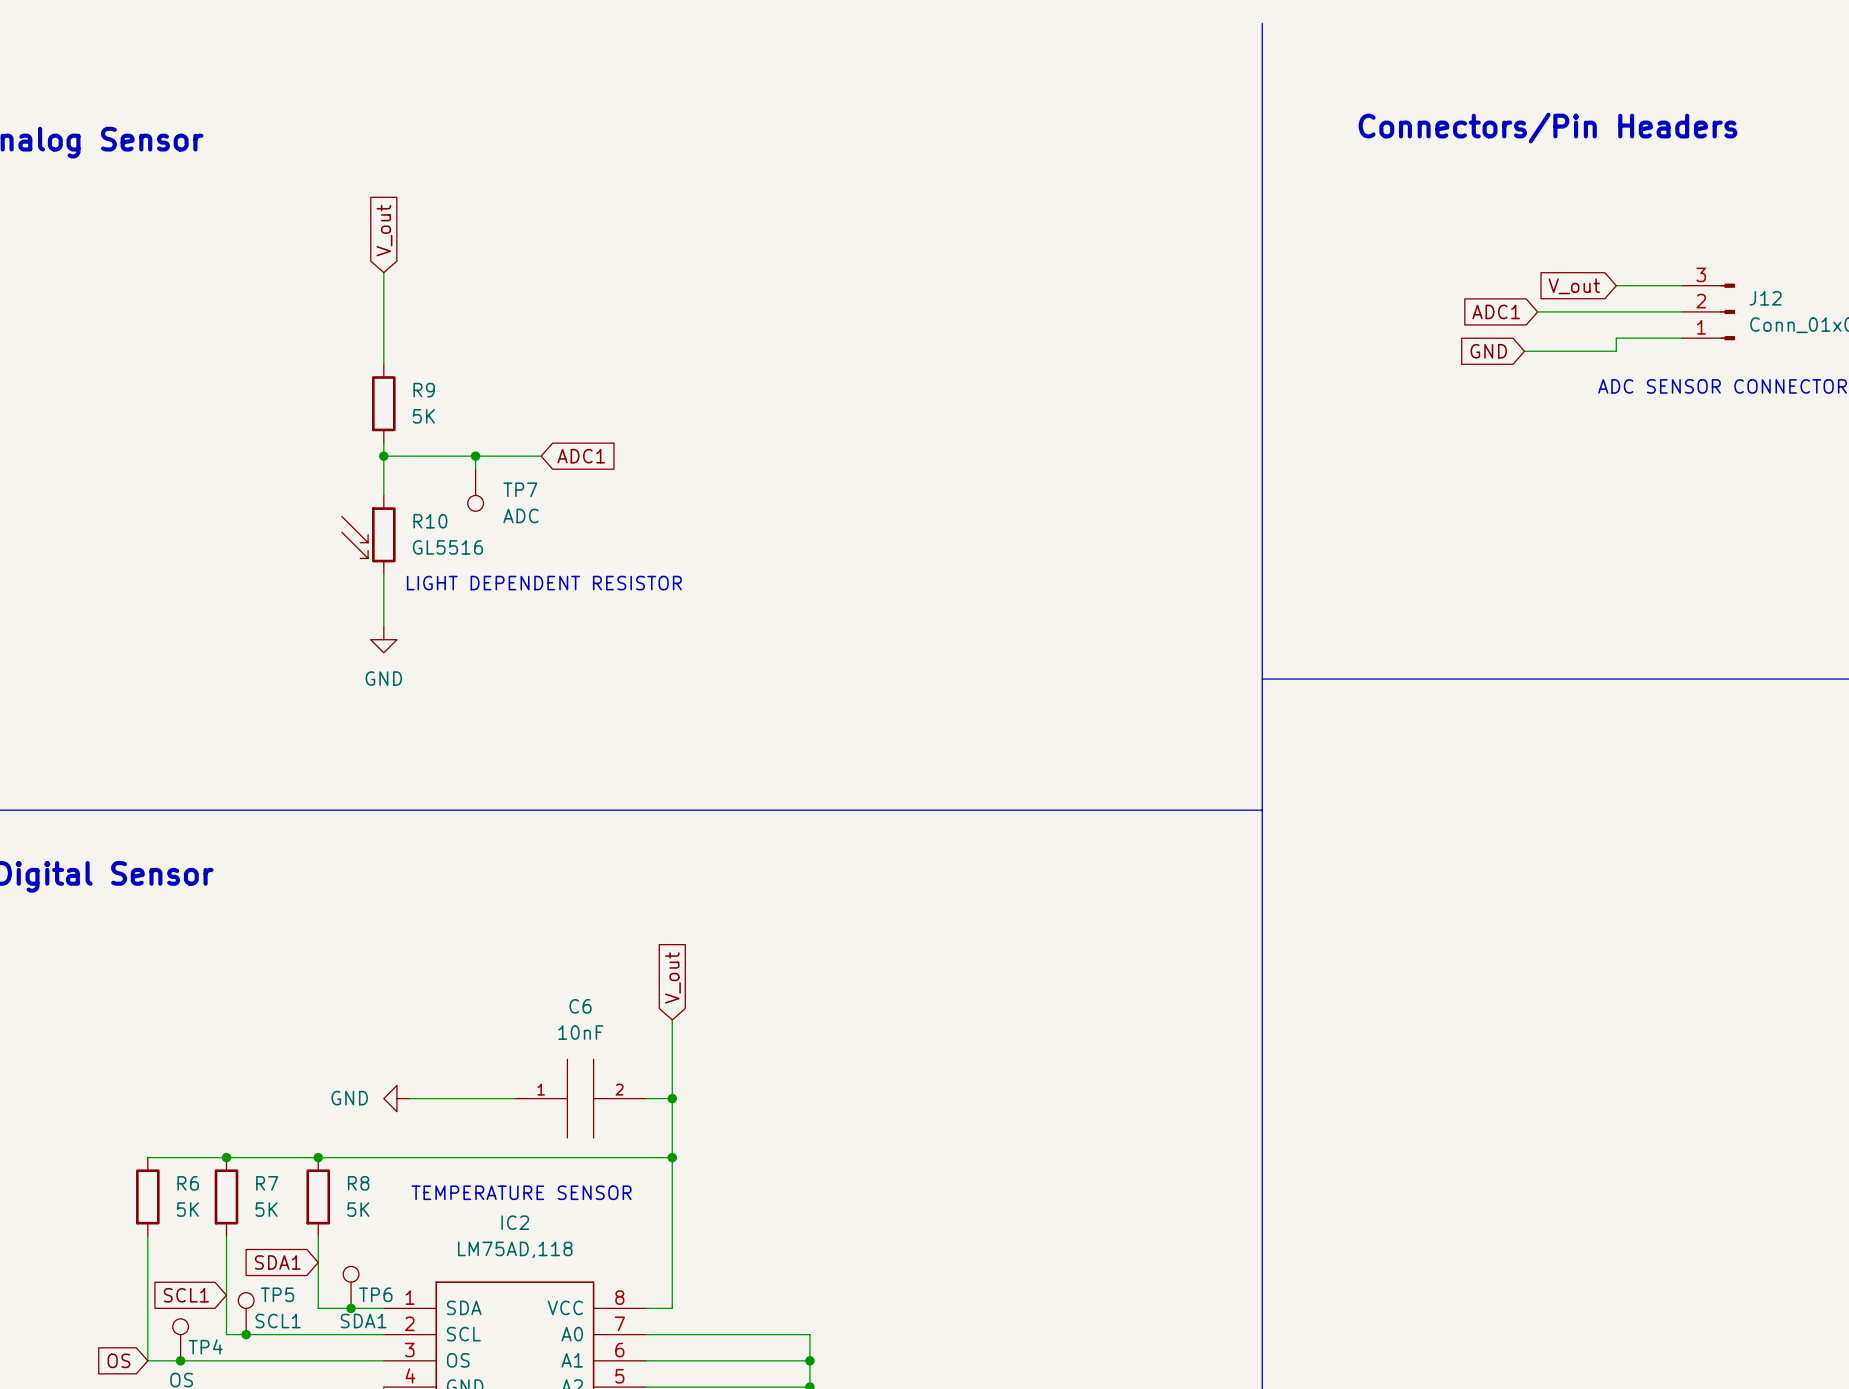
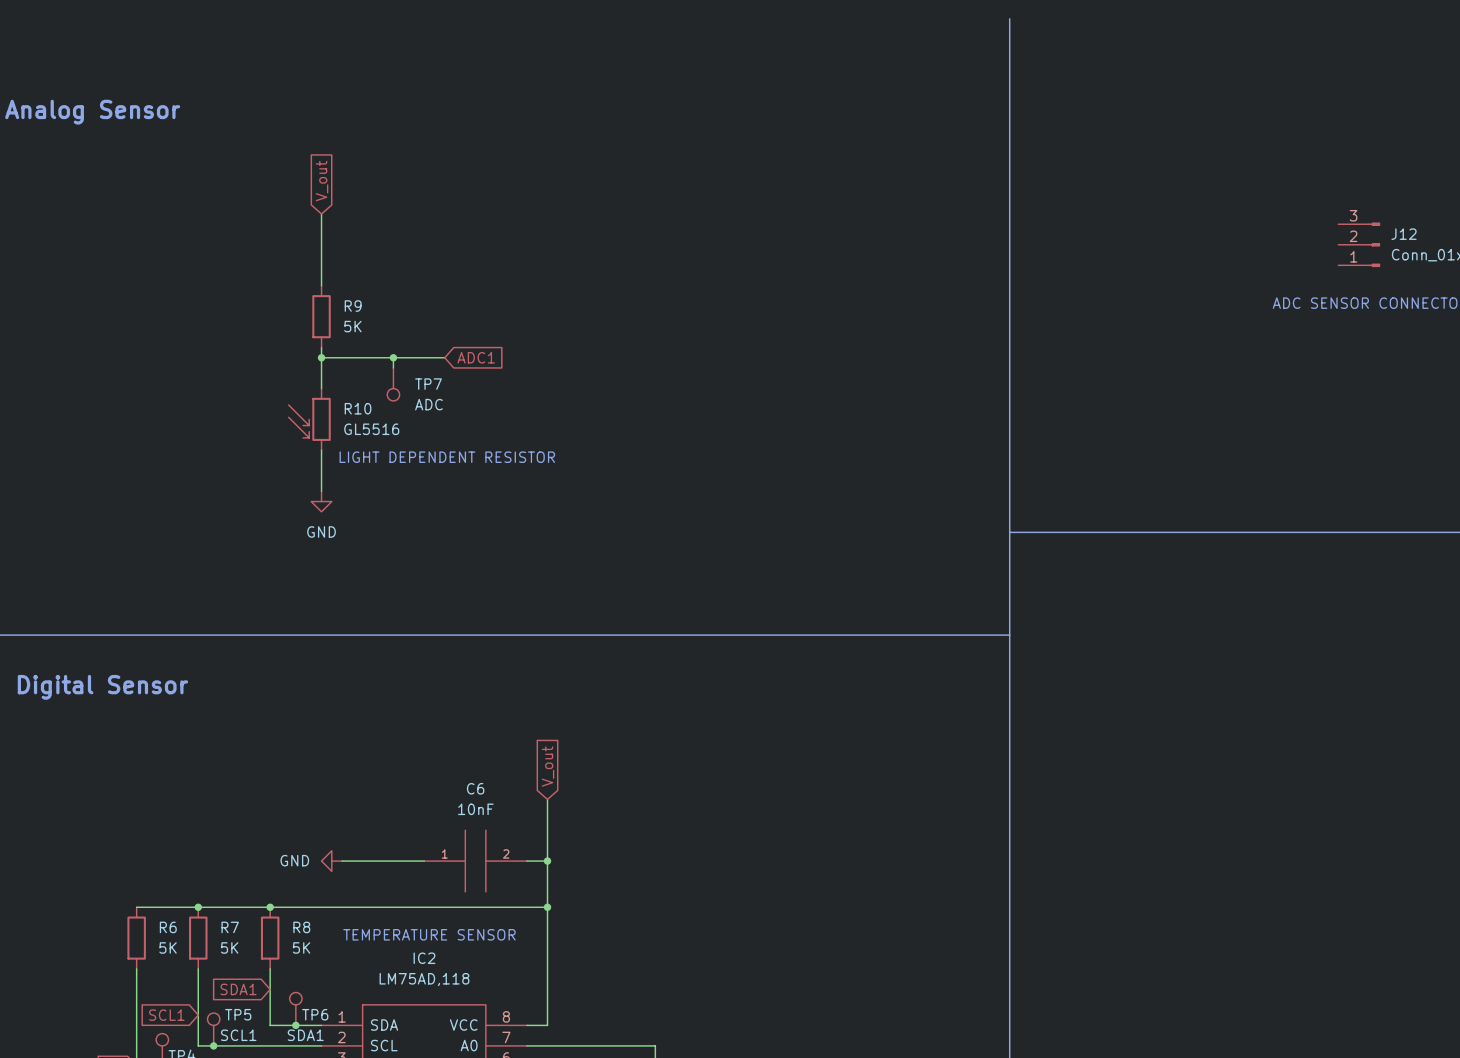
text: Connectors/Pin Headers (1548, 128) -> none
wire: (1616, 285) (1681, 285) -> none
global label: V_out (1574, 286) -> none
global label: ADC1 (1496, 311) -> none
wire: (1537, 311) (1681, 311) -> none
wire: (1681, 338) (1616, 338) (1616, 351) (1524, 351) -> none
global label: GND (1488, 351) -> none

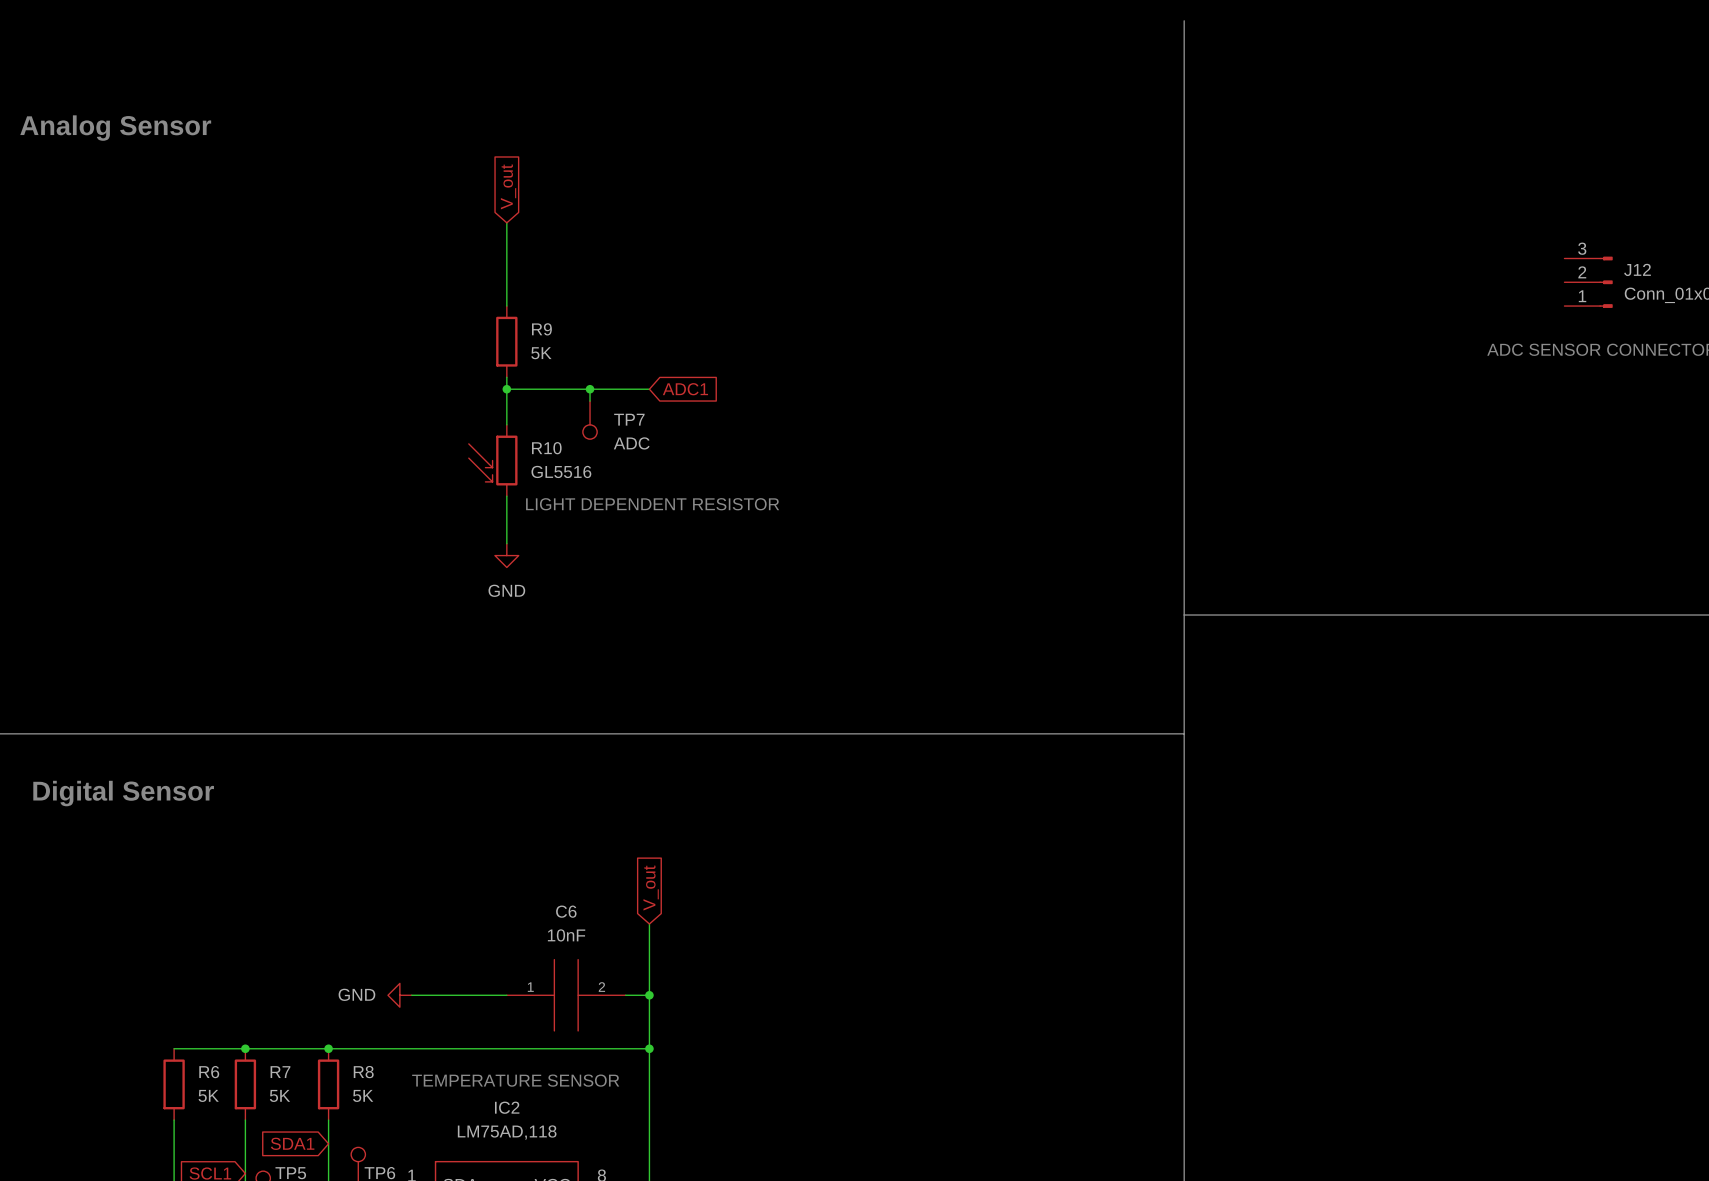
global label position: V_out (322, 181) -> V_out (508, 186)
wire: (321, 213) (321, 285) -> (506, 222) (506, 306)
R9 position: (321, 316) -> (506, 341)
junction: none -> (590, 389)
wire: (321, 347) (321, 388) -> (506, 377) (506, 424)
wire: (321, 357) (444, 357) -> (506, 389) (649, 389)
junction: (321, 357) -> none
wire: (393, 357) (393, 368) -> (590, 389) (590, 401)
junction position: (393, 357) -> (506, 389)
global label position: ADC1 (476, 357) -> ADC1 (685, 389)
TP7 position: (393, 384) -> (590, 420)
R10 position: (309, 419) -> (493, 460)
wire: (321, 450) (321, 491) -> (506, 496) (506, 543)
text position: LIGHT DEPENDENT RESISTOR (447, 457) -> LIGHT DEPENDENT RESISTOR (652, 504)
power symbol position: GND (321, 501) -> GND (506, 555)

